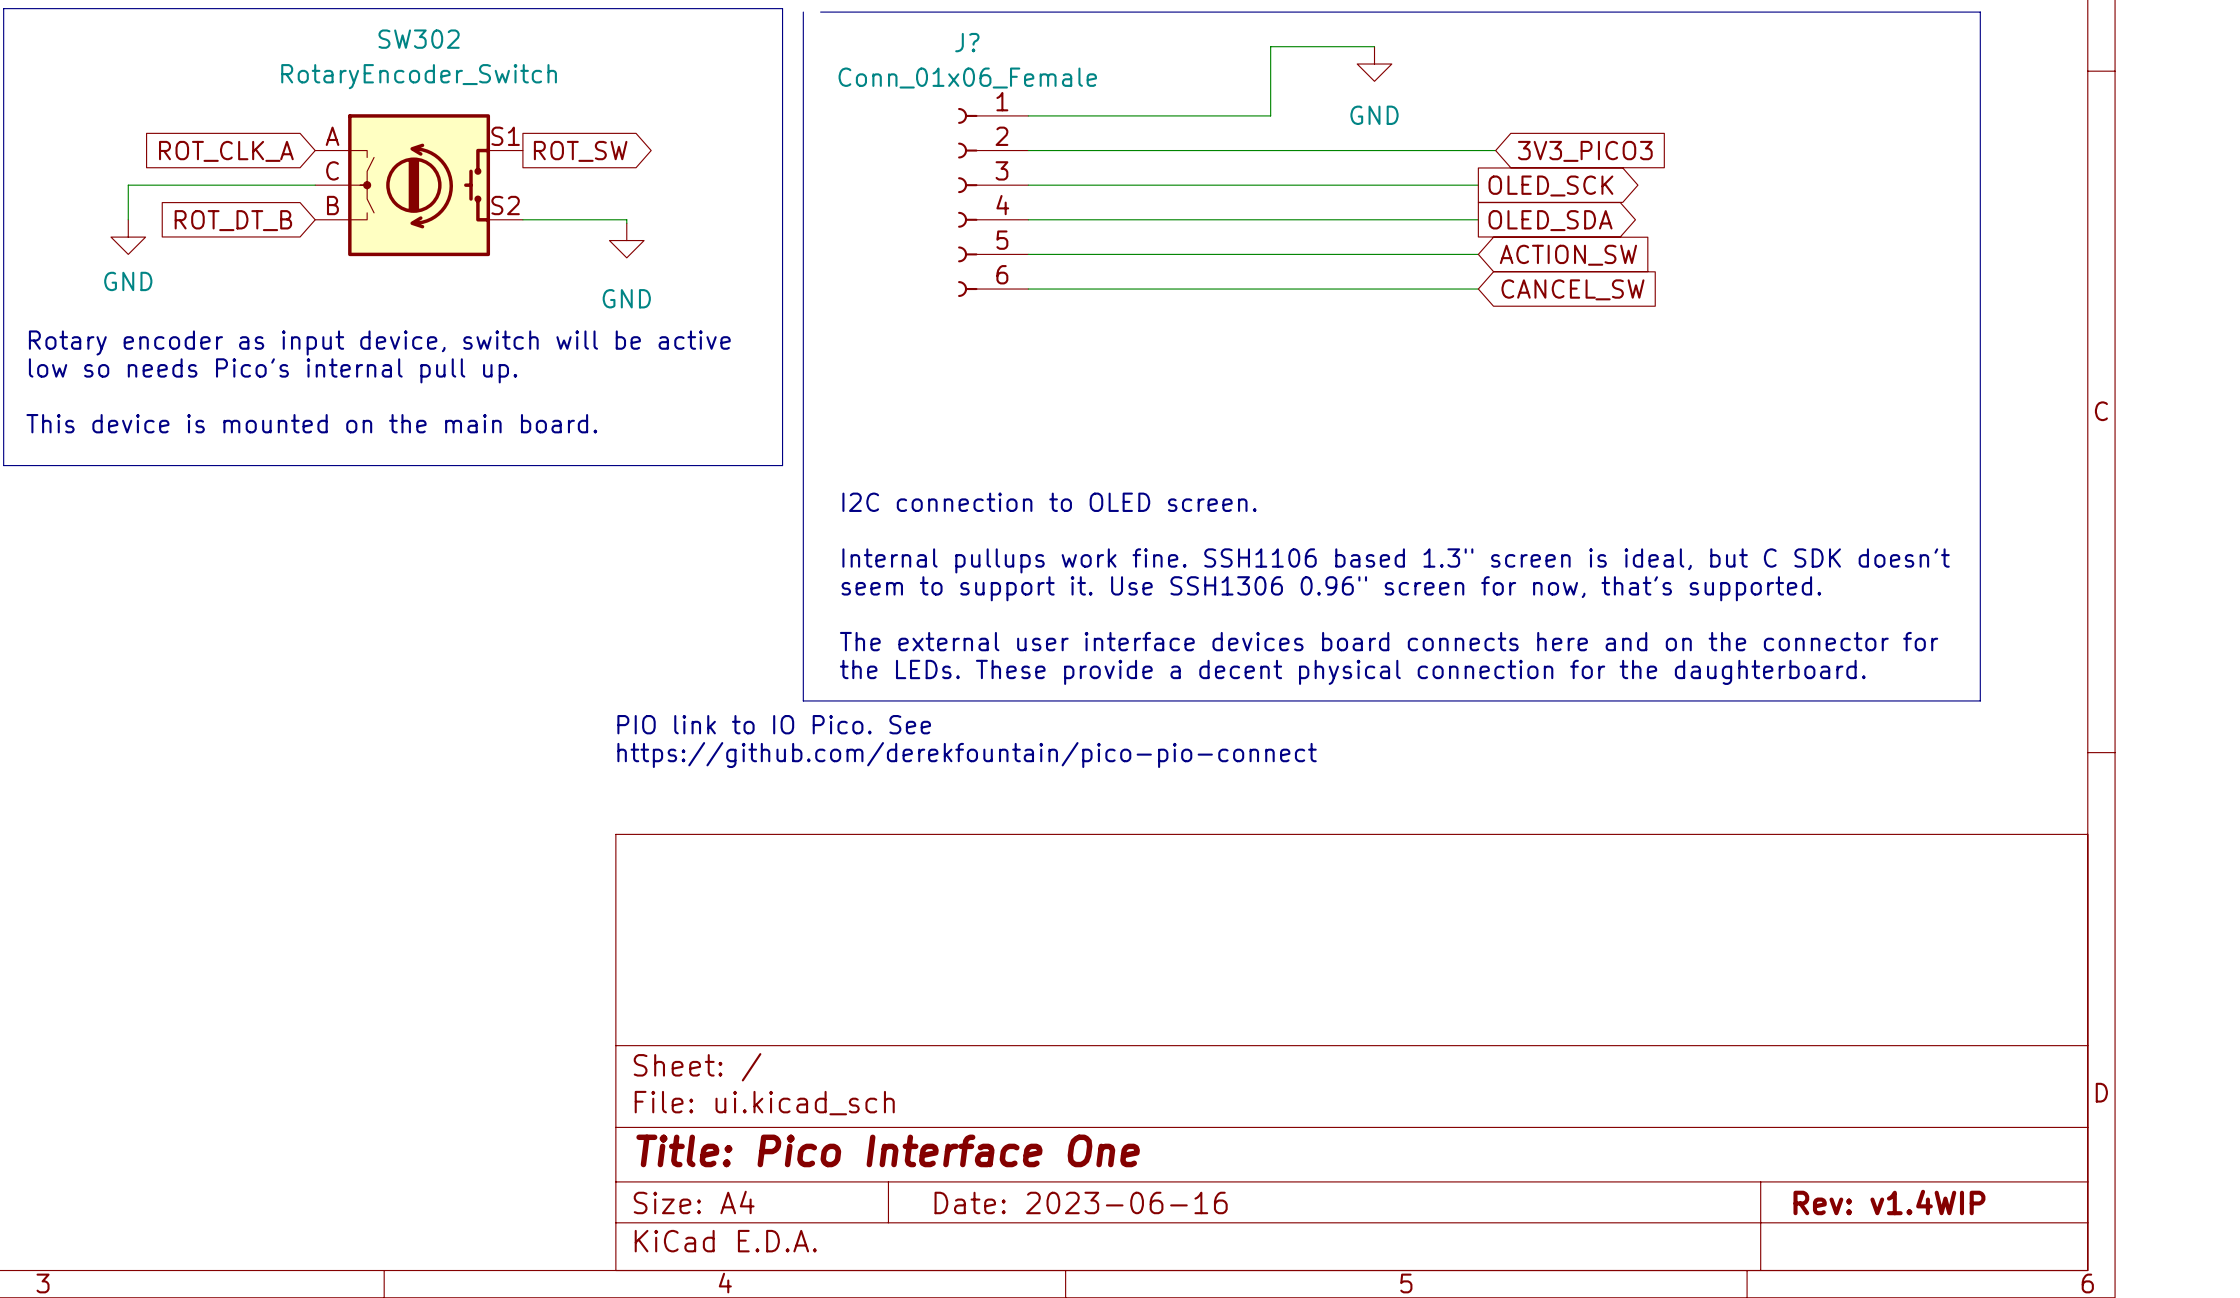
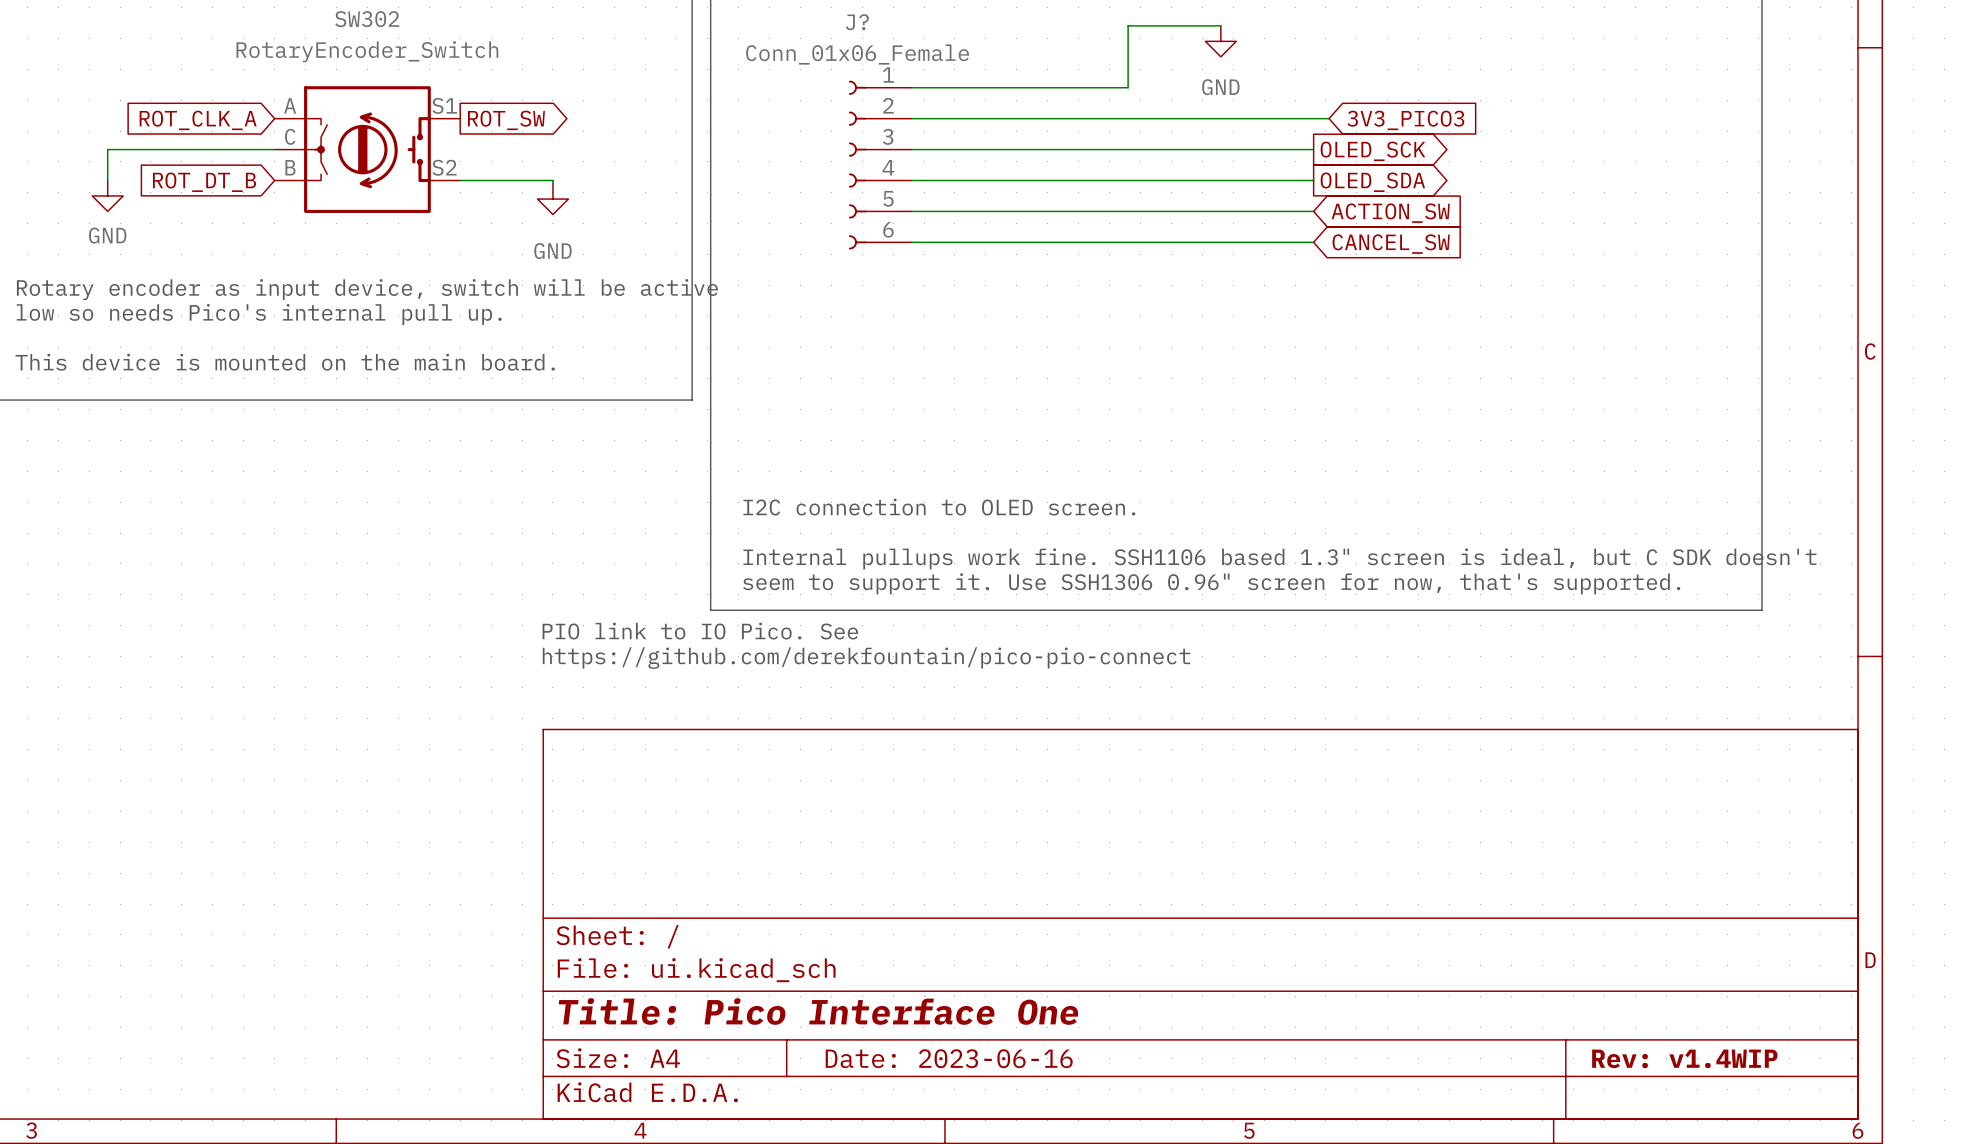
text: I2C connection to OLED screen. (1049, 502) -> none
text: Internal pullups work fine. SSH1106 based 1.3" screen is ideal, but C SDK doesn't (1396, 560) -> none
text: seem to support it. Use SSH1306 0.96" screen for now, that's supported. (1331, 588) -> I2C connection to OLED screen. (939, 507)
text: The external user interface devices board connects here and on the connector for (1389, 641) -> Internal pullups work fine. SSH1106 based 1.3" screen is ideal, but C SDK doesn't (1279, 558)
text: the LEDs. These provide a decent physical connection for the daughterboard. (1352, 672) -> seem to support it. Use SSH1306 0.96" screen for now, that's supported. (1211, 583)

